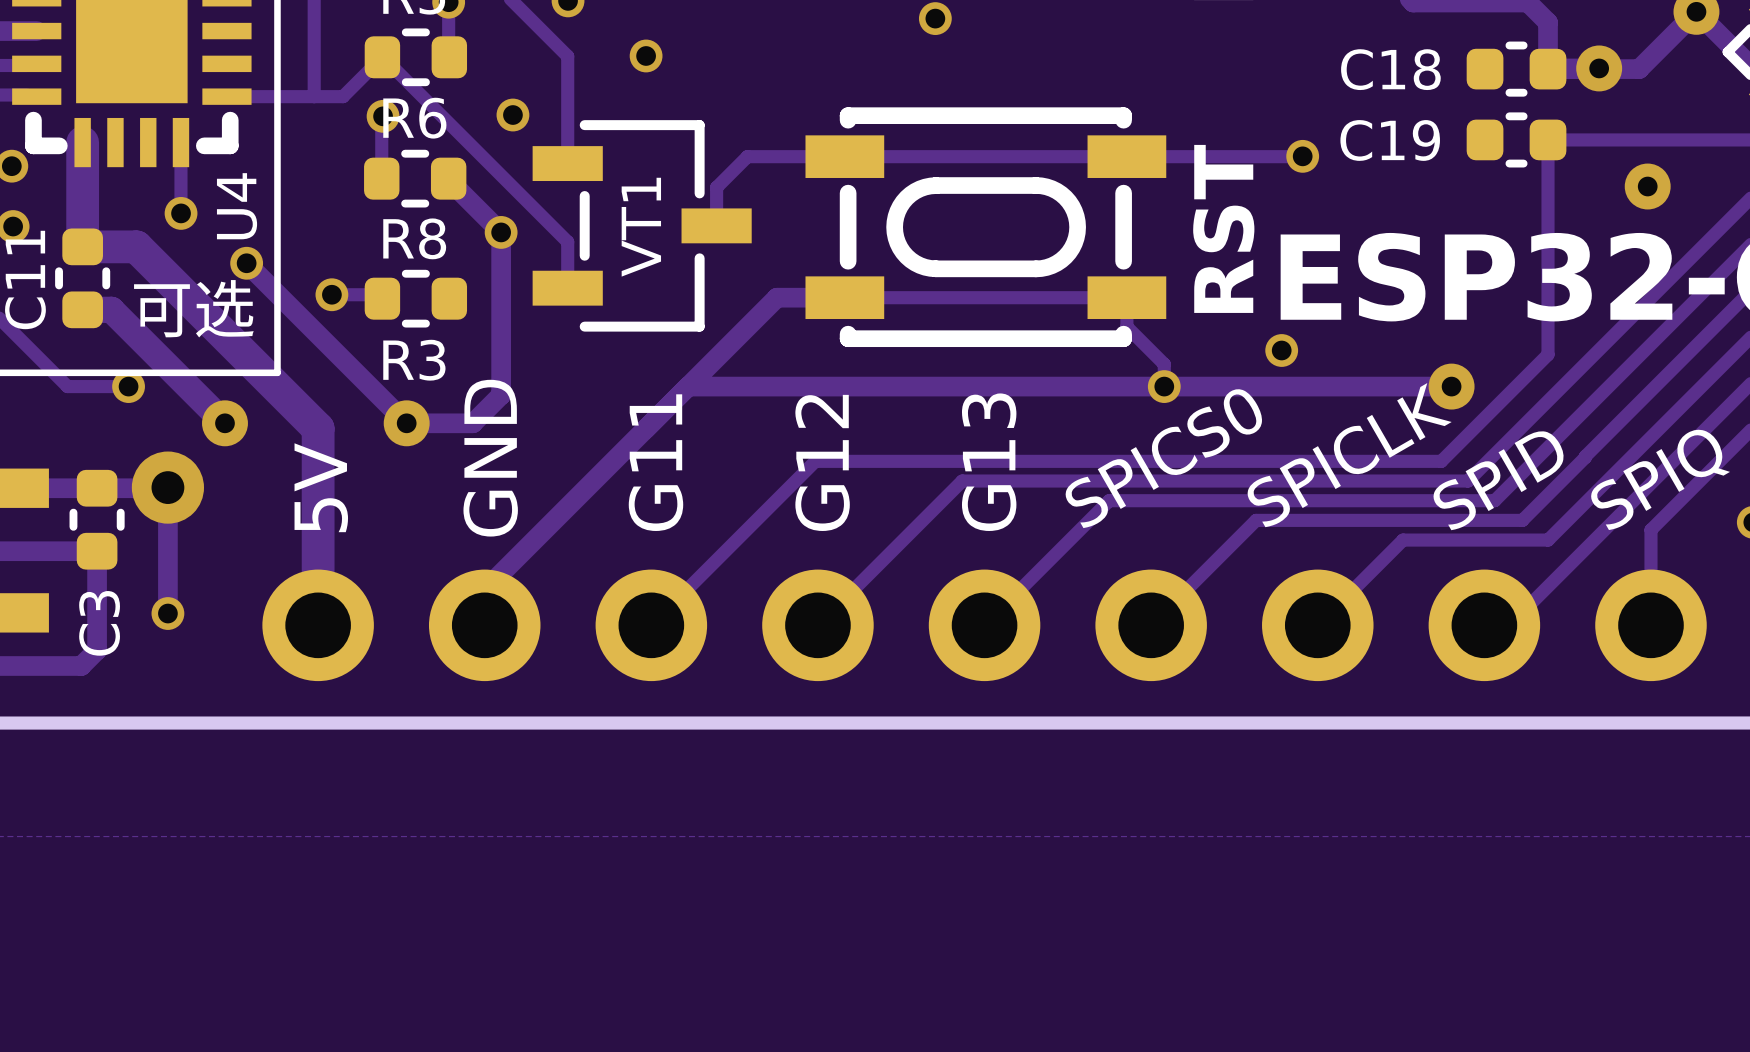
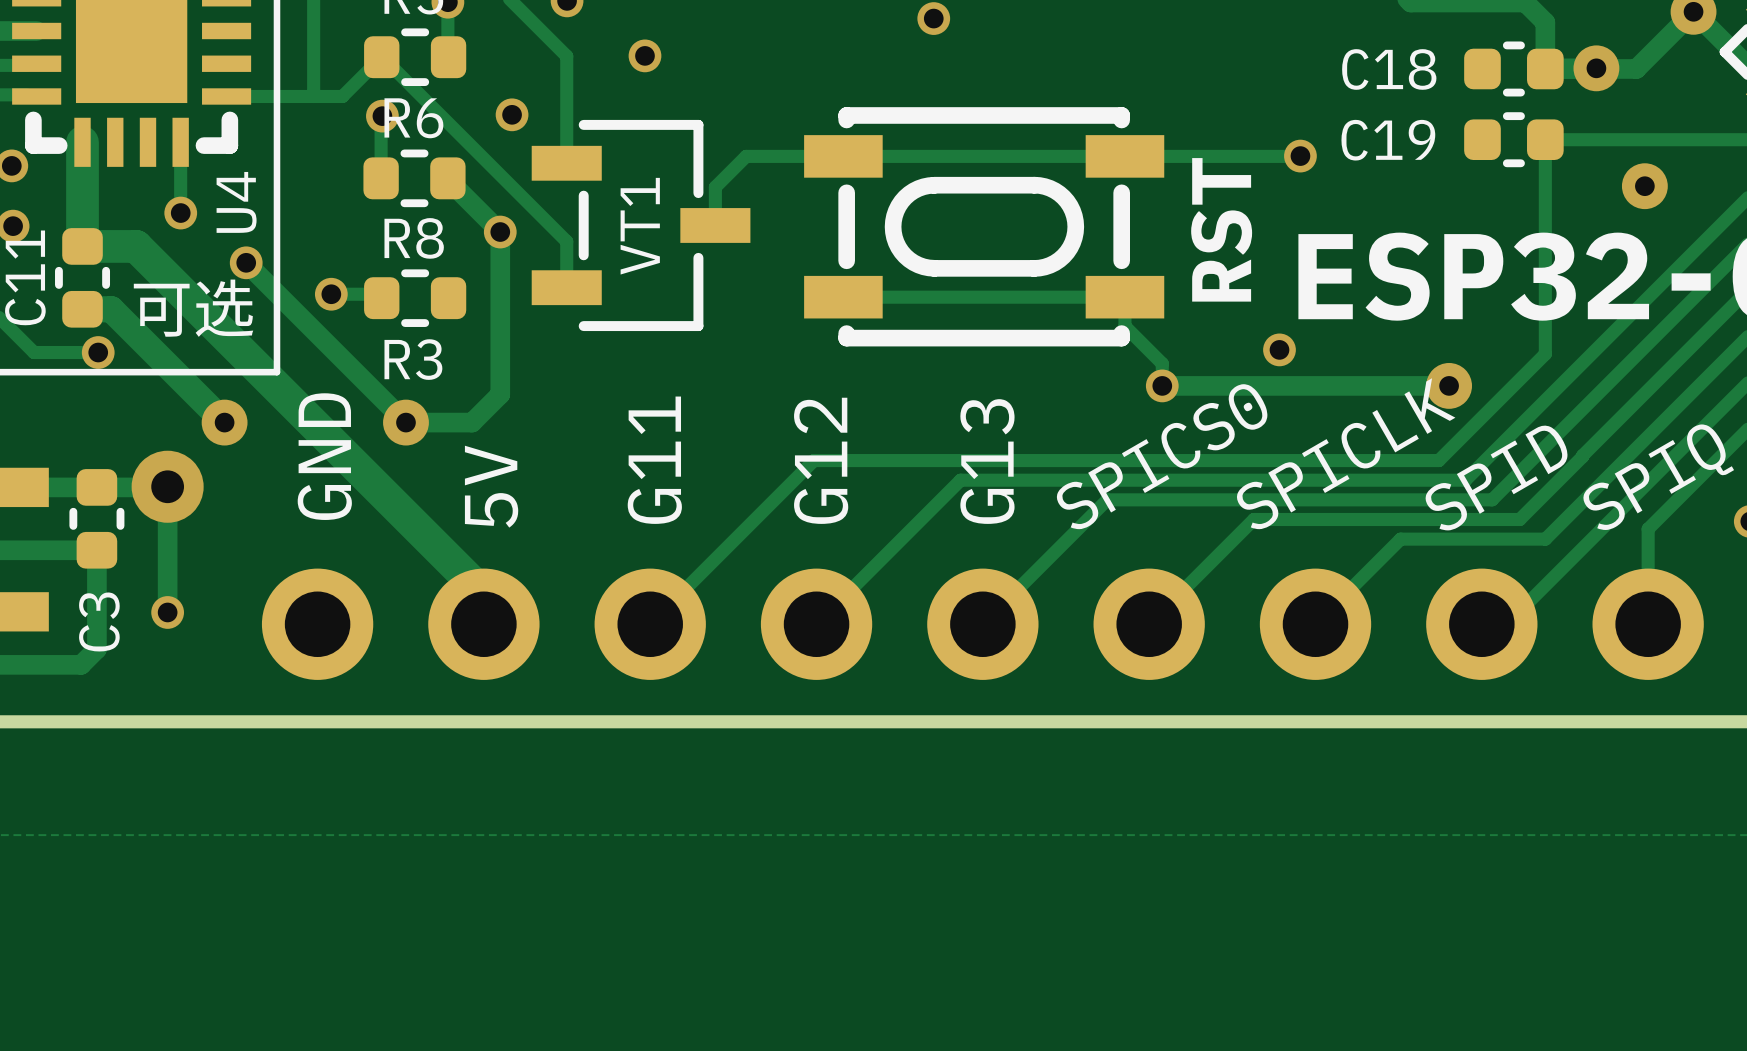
track: (812, 297) (776, 297) (484, 589) -> none
track: (34, 353) (67, 386) (128, 386) -> (34, 352) (98, 352)
via position: (128, 386) -> (98, 352)
track: (688, 386) (1164, 386) -> none
track: (318, 428) (318, 625) -> (317, 427) (483, 594) (483, 624)
text: GND (490, 458) -> 5V (491, 486)
text: 5V (321, 487) -> GND (324, 456)

